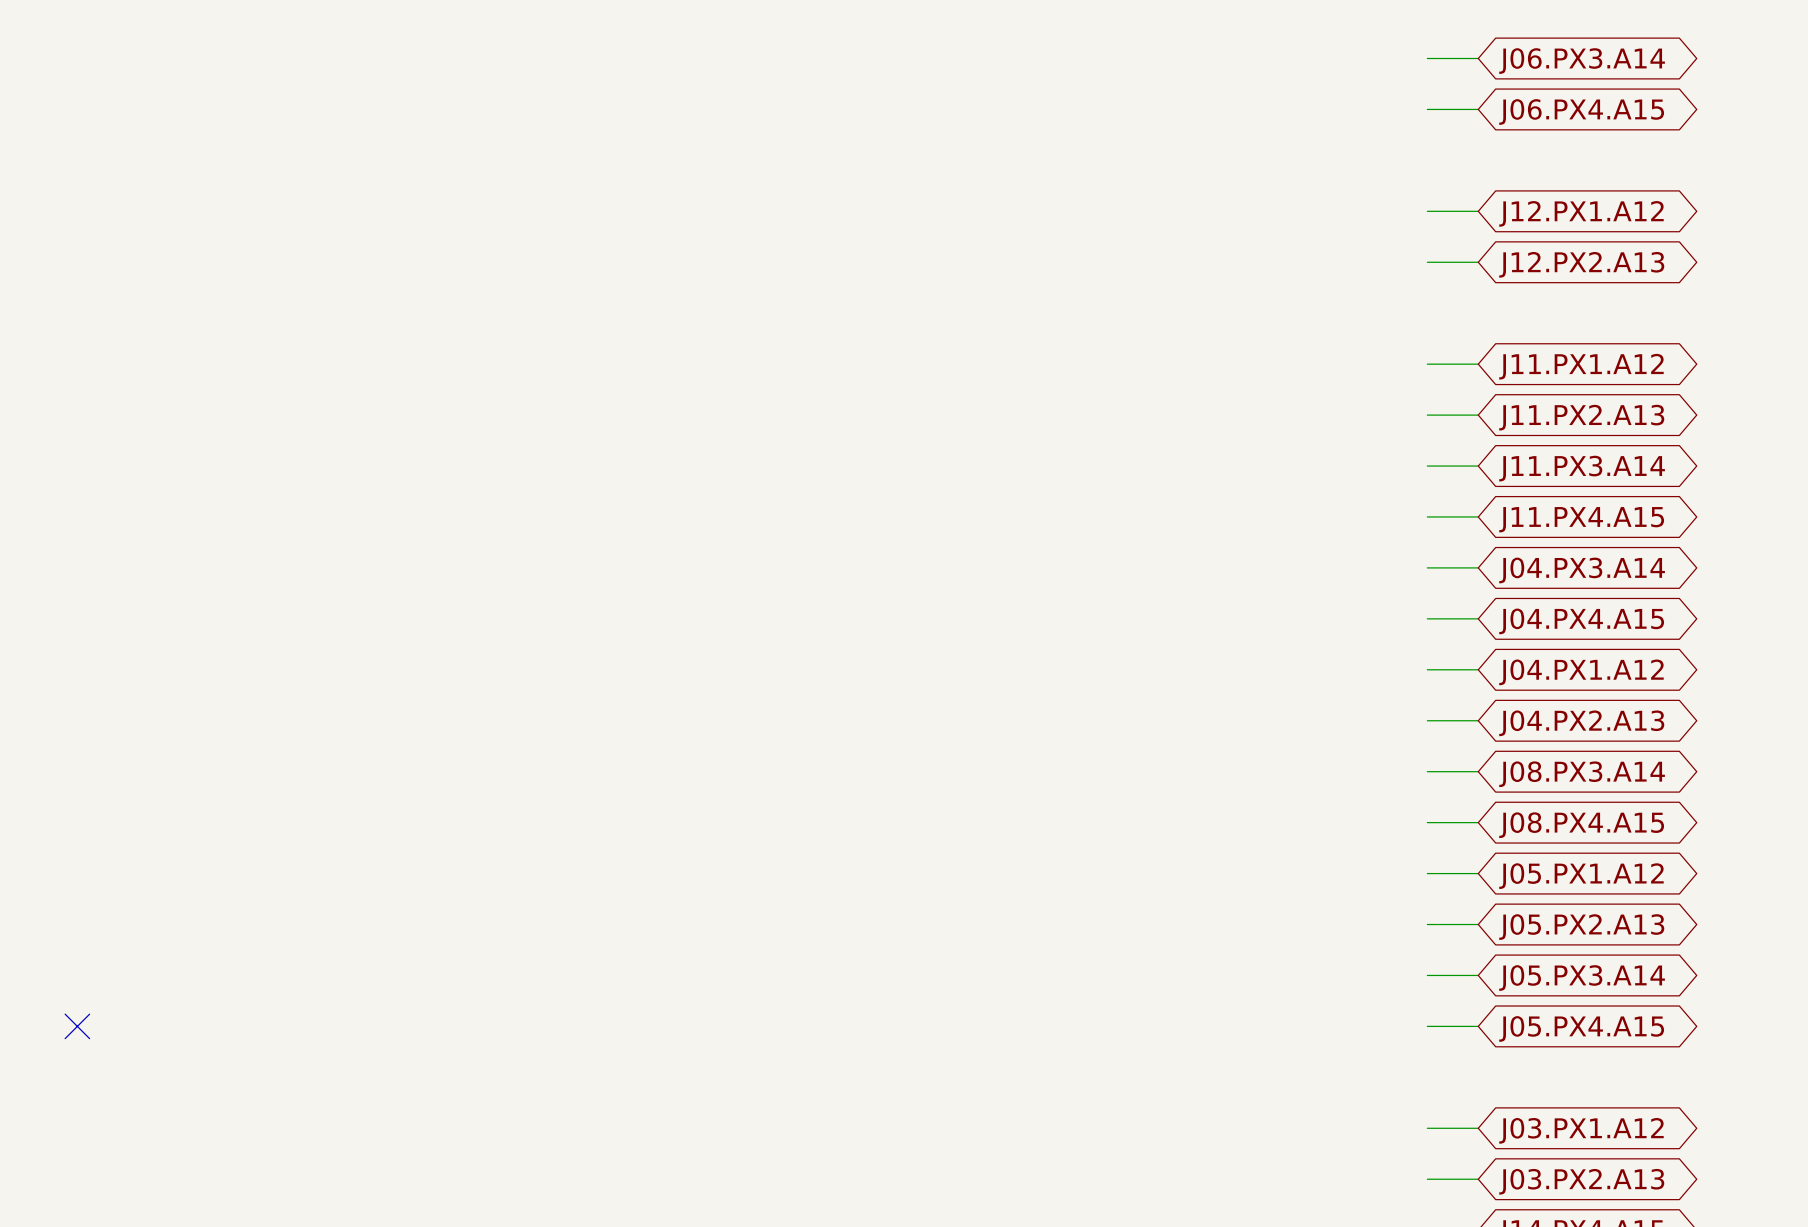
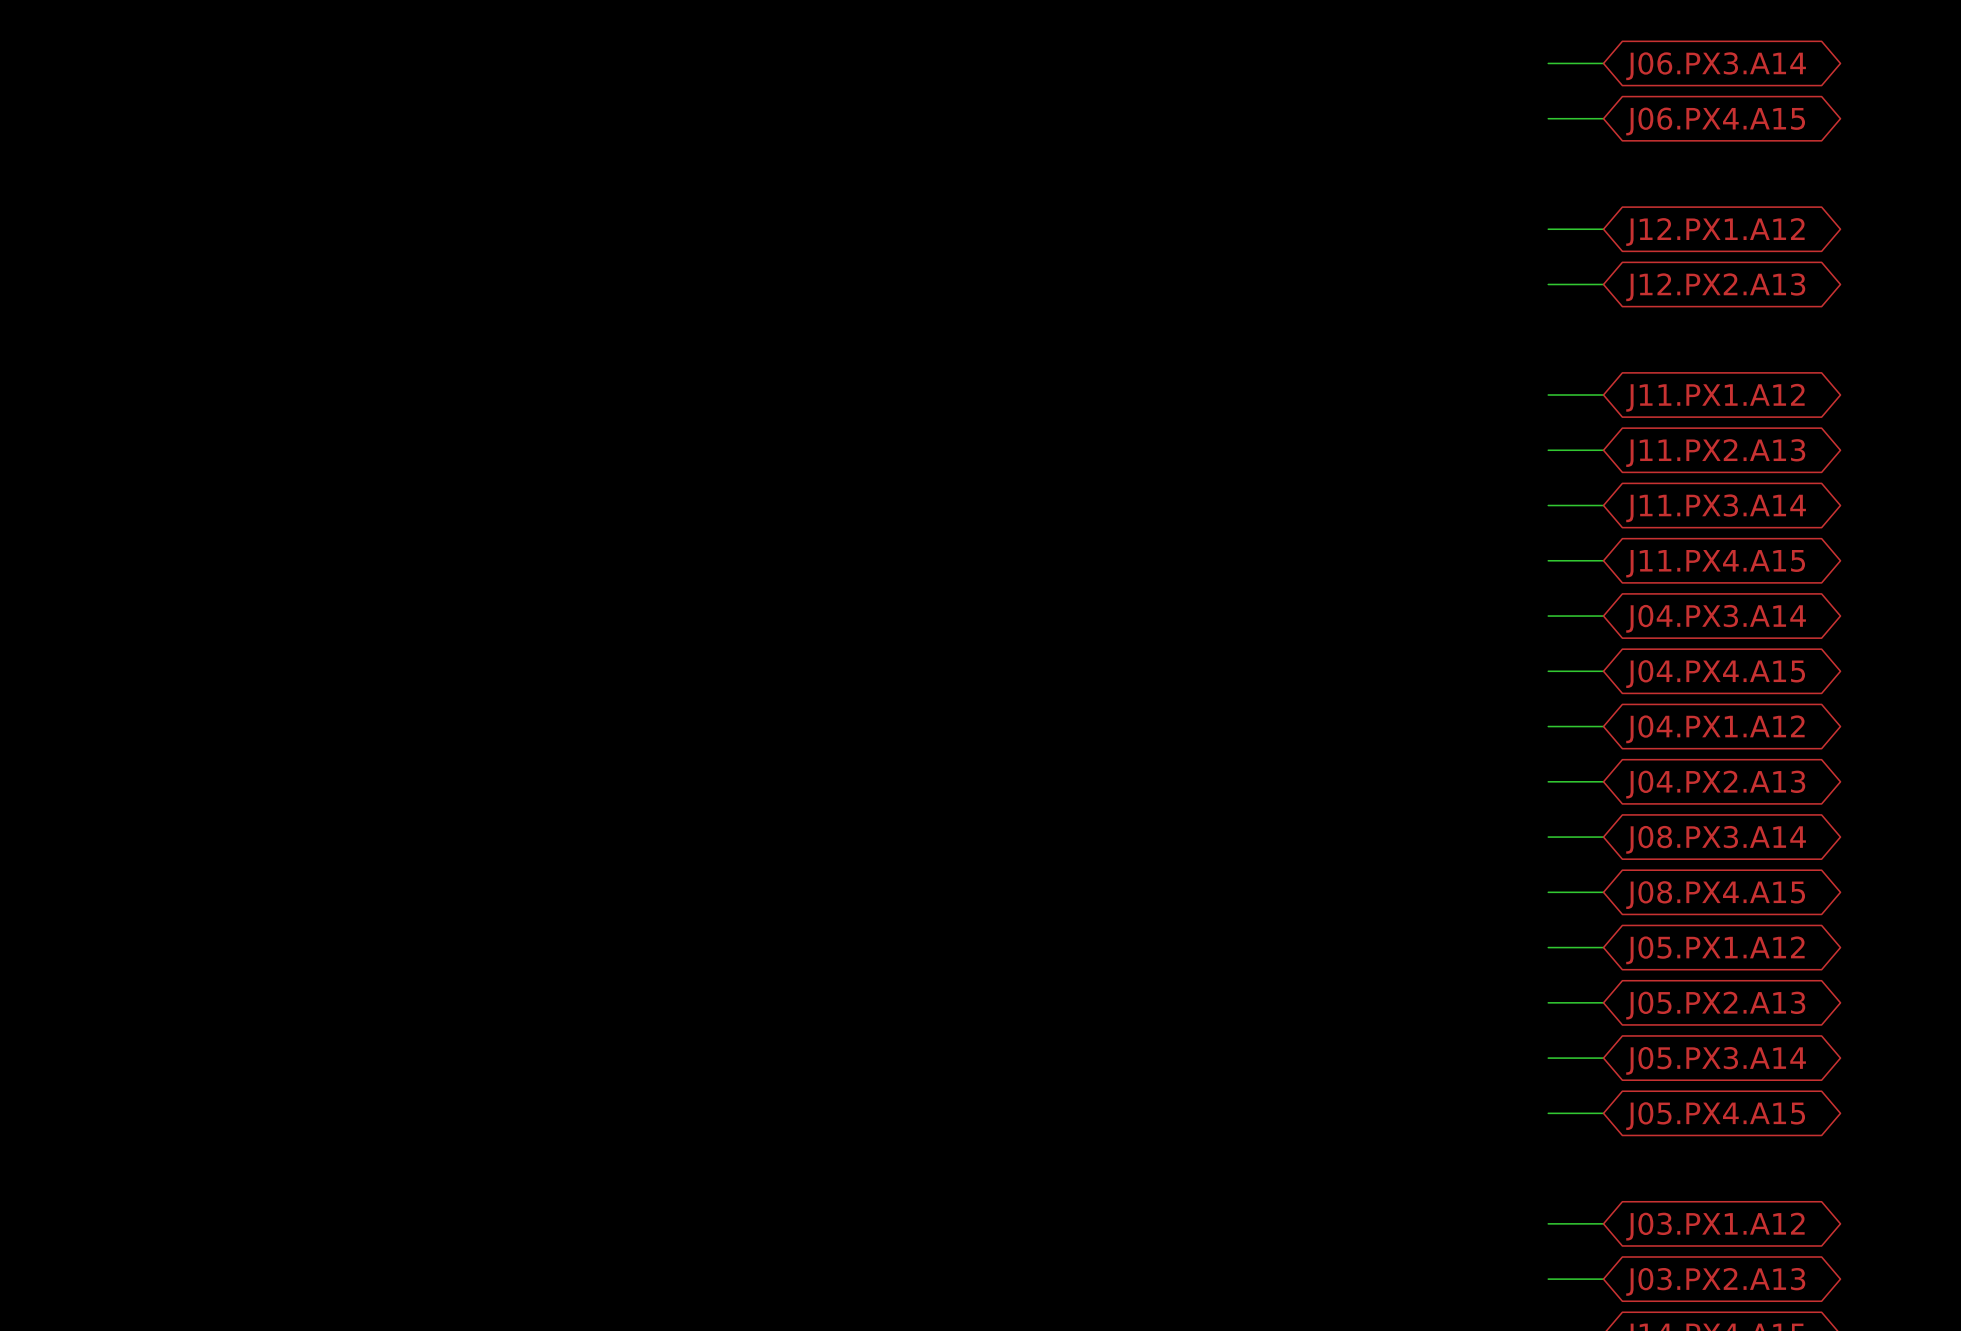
no-connect mark: (77, 1026) -> none

